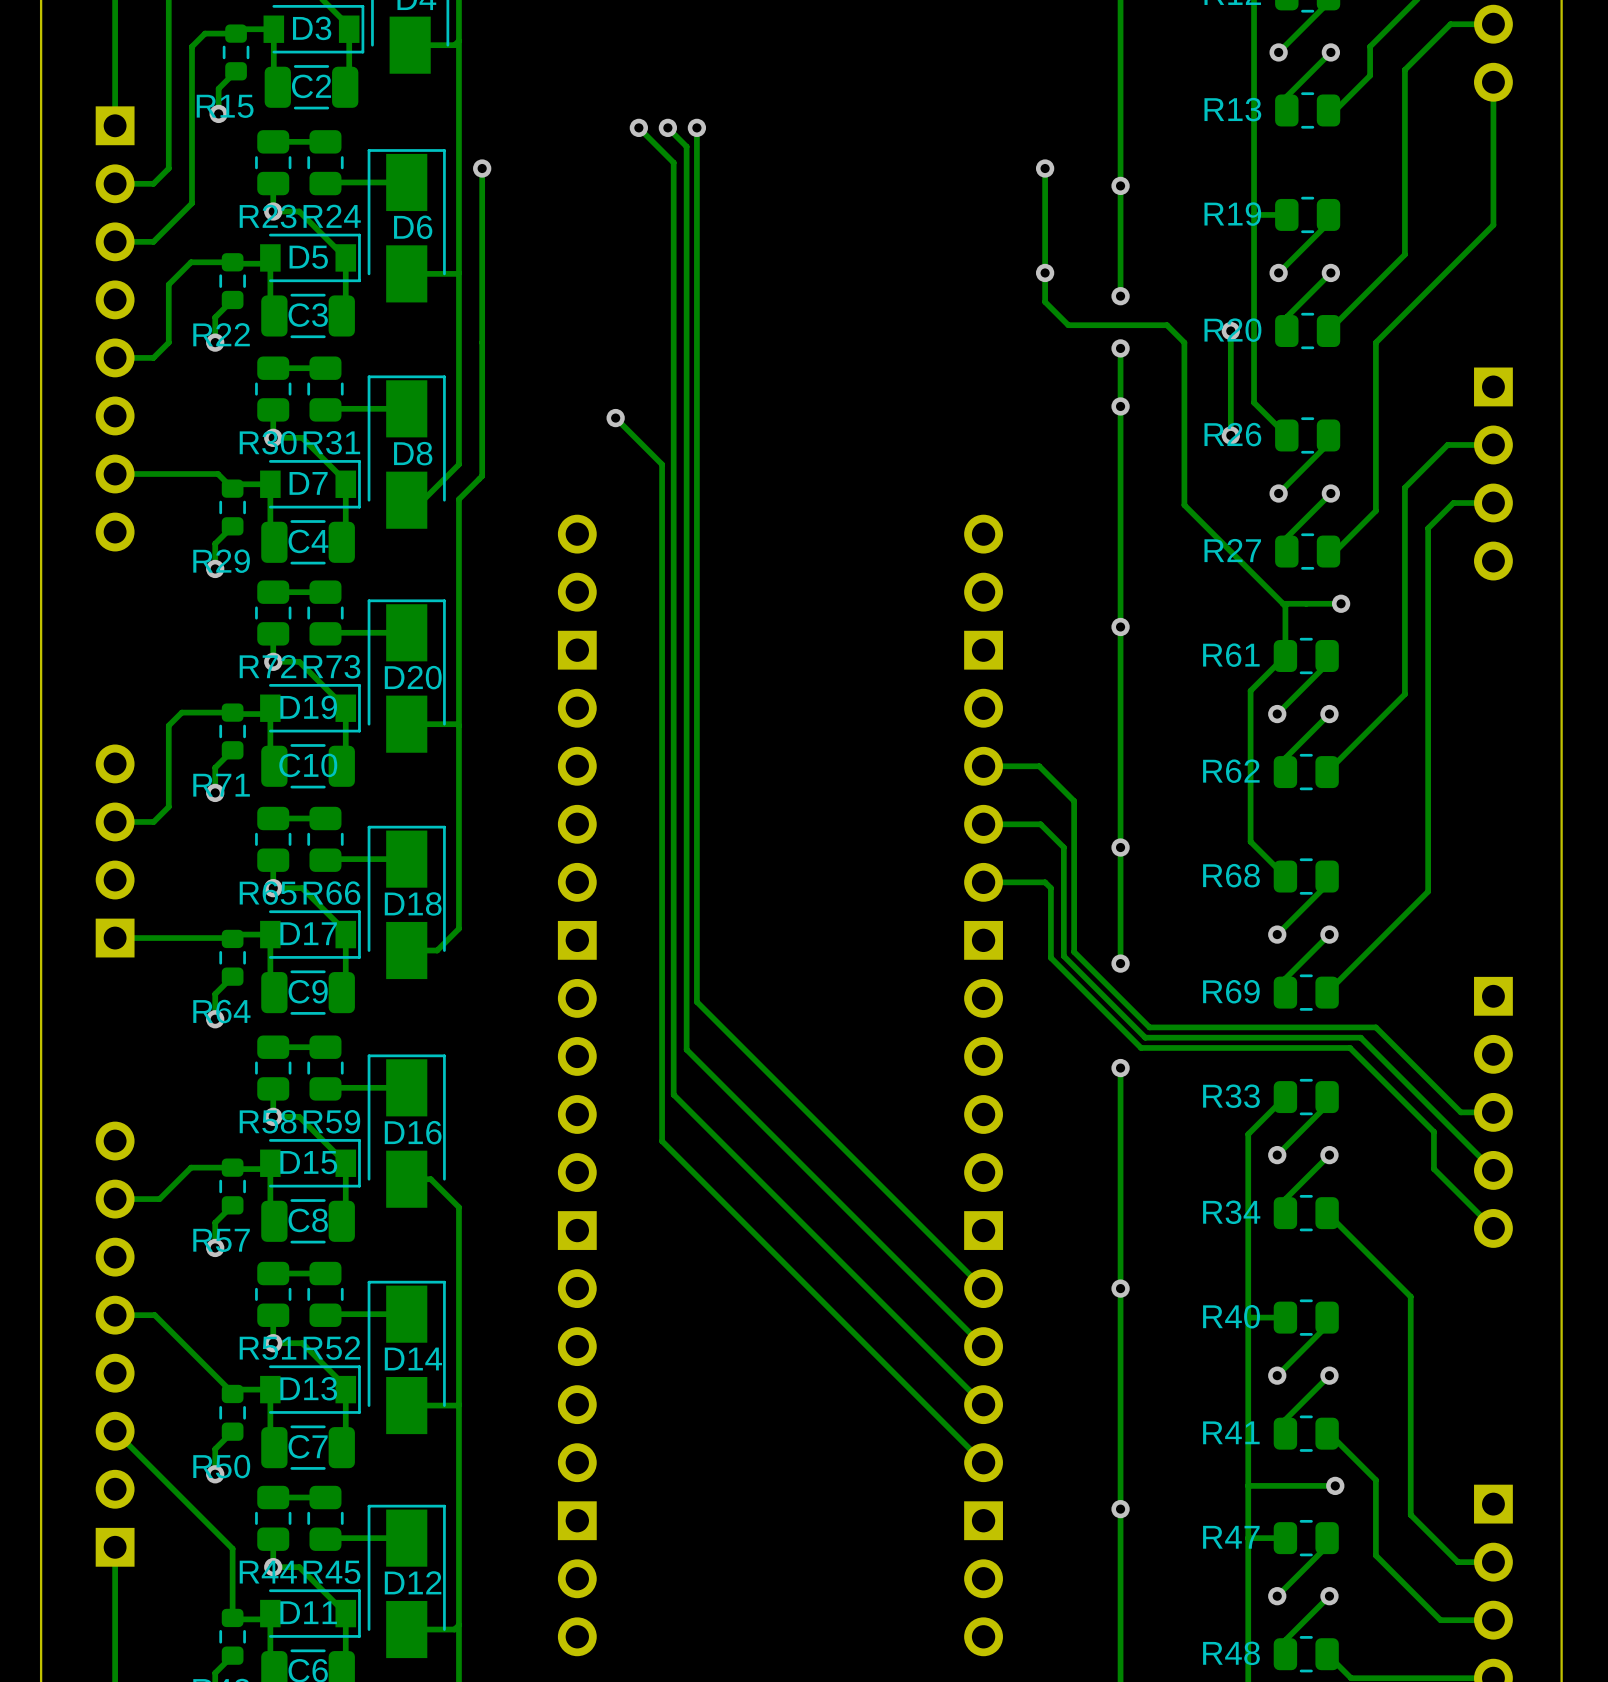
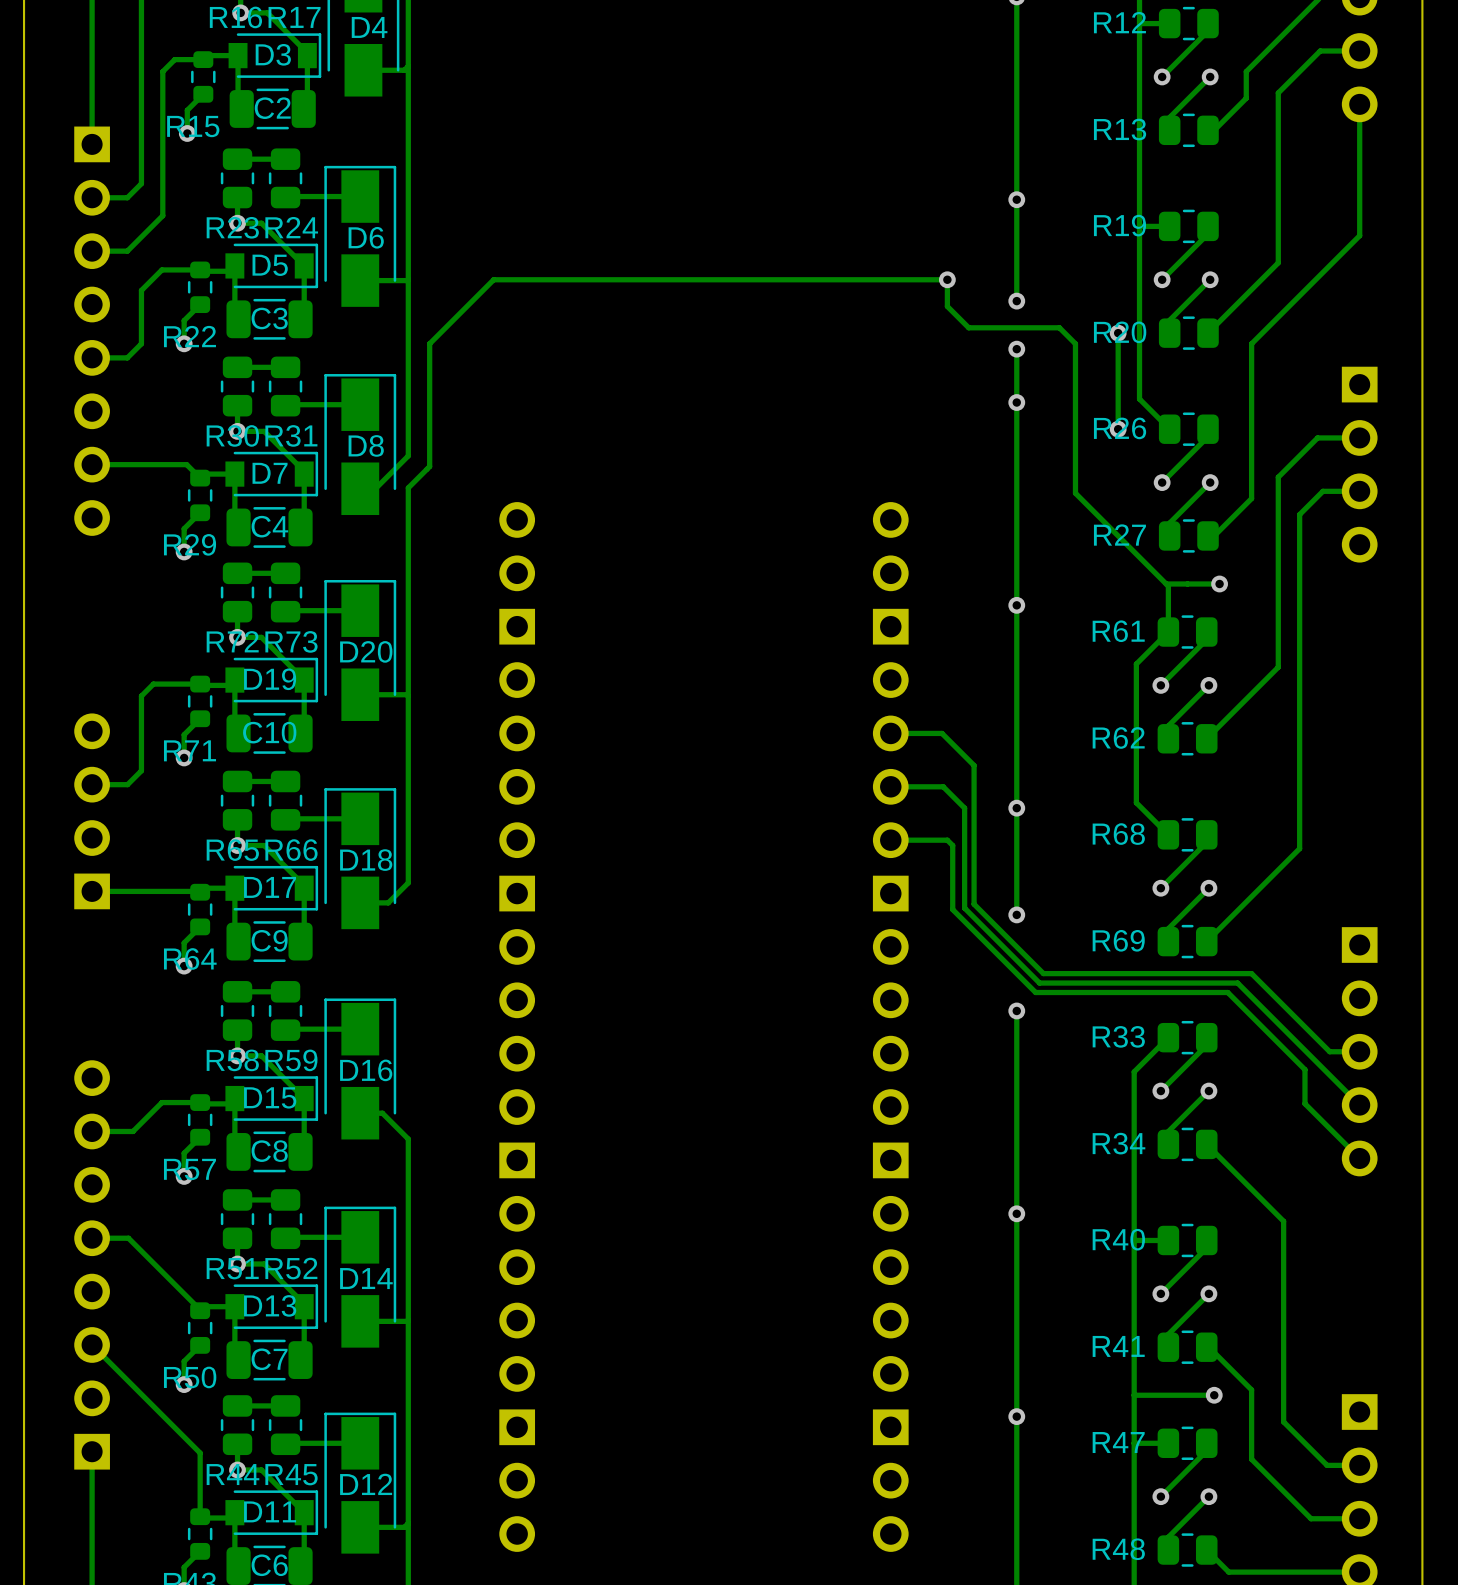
track: (638, 127) (673, 162) (673, 1094) (983, 1404) -> none
via: (638, 127) -> none
track: (667, 127) (686, 146) (686, 1049) (983, 1346) -> none
via: (667, 127) -> none
track: (696, 127) (696, 1001) (983, 1288) -> none
via: (696, 127) -> none
track: (482, 168) (482, 342) -> (947, 279) (493, 279) (429, 343)
via: (482, 168) -> none
track: (1045, 168) (1045, 272) -> none
via: (1045, 168) -> none
track: (615, 418) (662, 464) (662, 1141) (983, 1462) -> none
via: (615, 418) -> none

